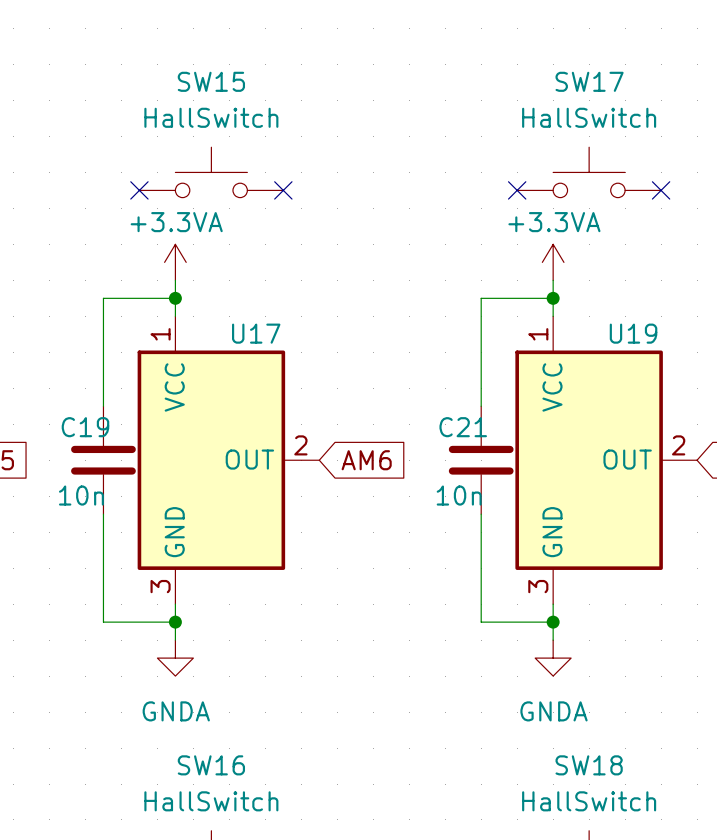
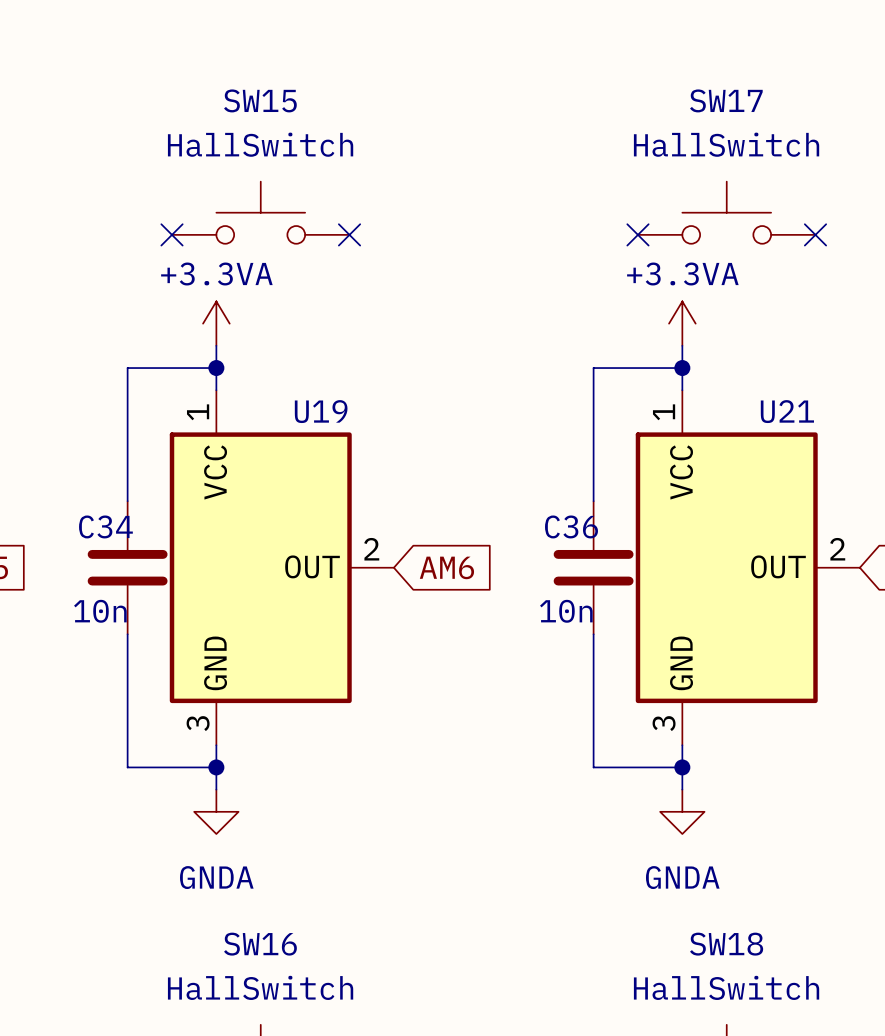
U17 name: U17 (256, 333) -> U19 (321, 411)
U19 name: U19 (633, 333) -> U21 (787, 411)
C19 name: C19 (85, 427) -> C34 (105, 526)
C21 name: C21 (463, 427) -> C36 (571, 526)

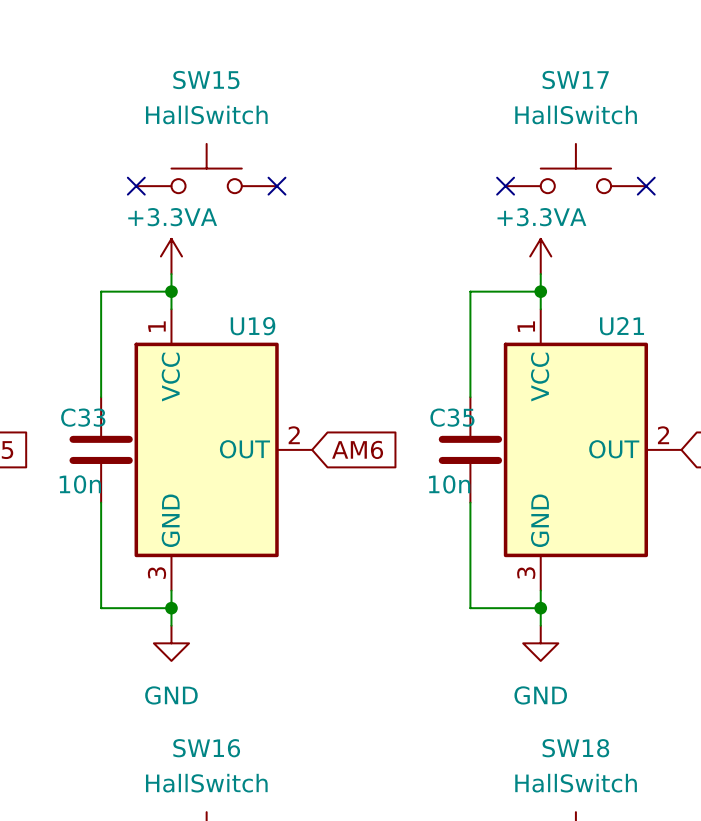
C34 name: C34 (105, 526) -> C33 (83, 417)
C36 name: C36 (571, 526) -> C35 (452, 417)
power symbol: GNDA (216, 811) -> GND (171, 643)
power symbol: GNDA (682, 811) -> GND (540, 643)

